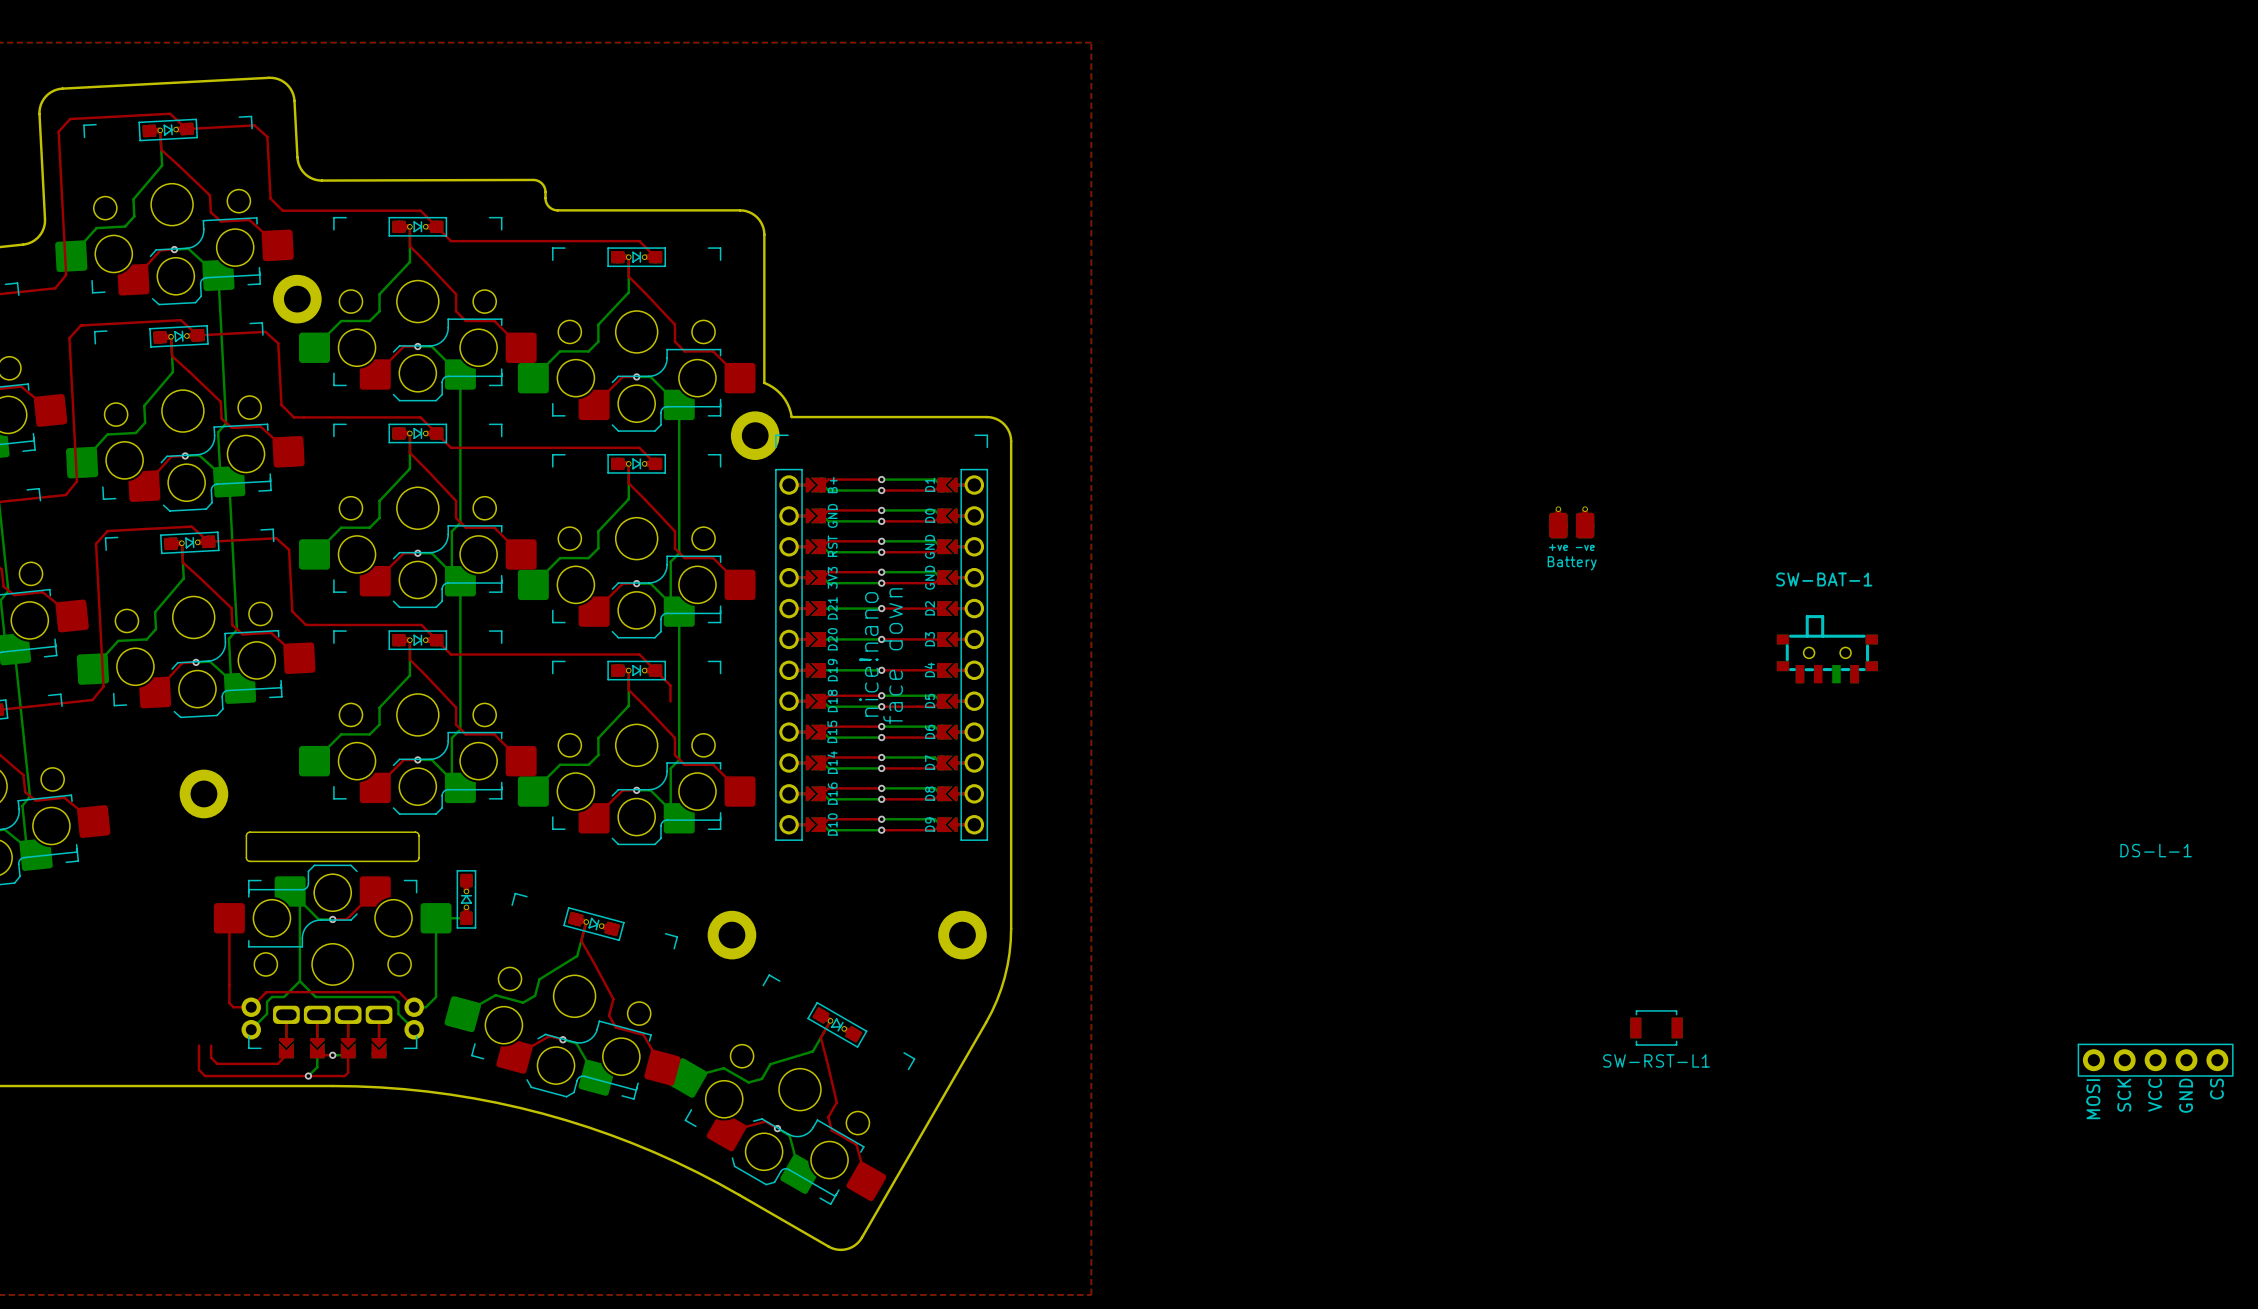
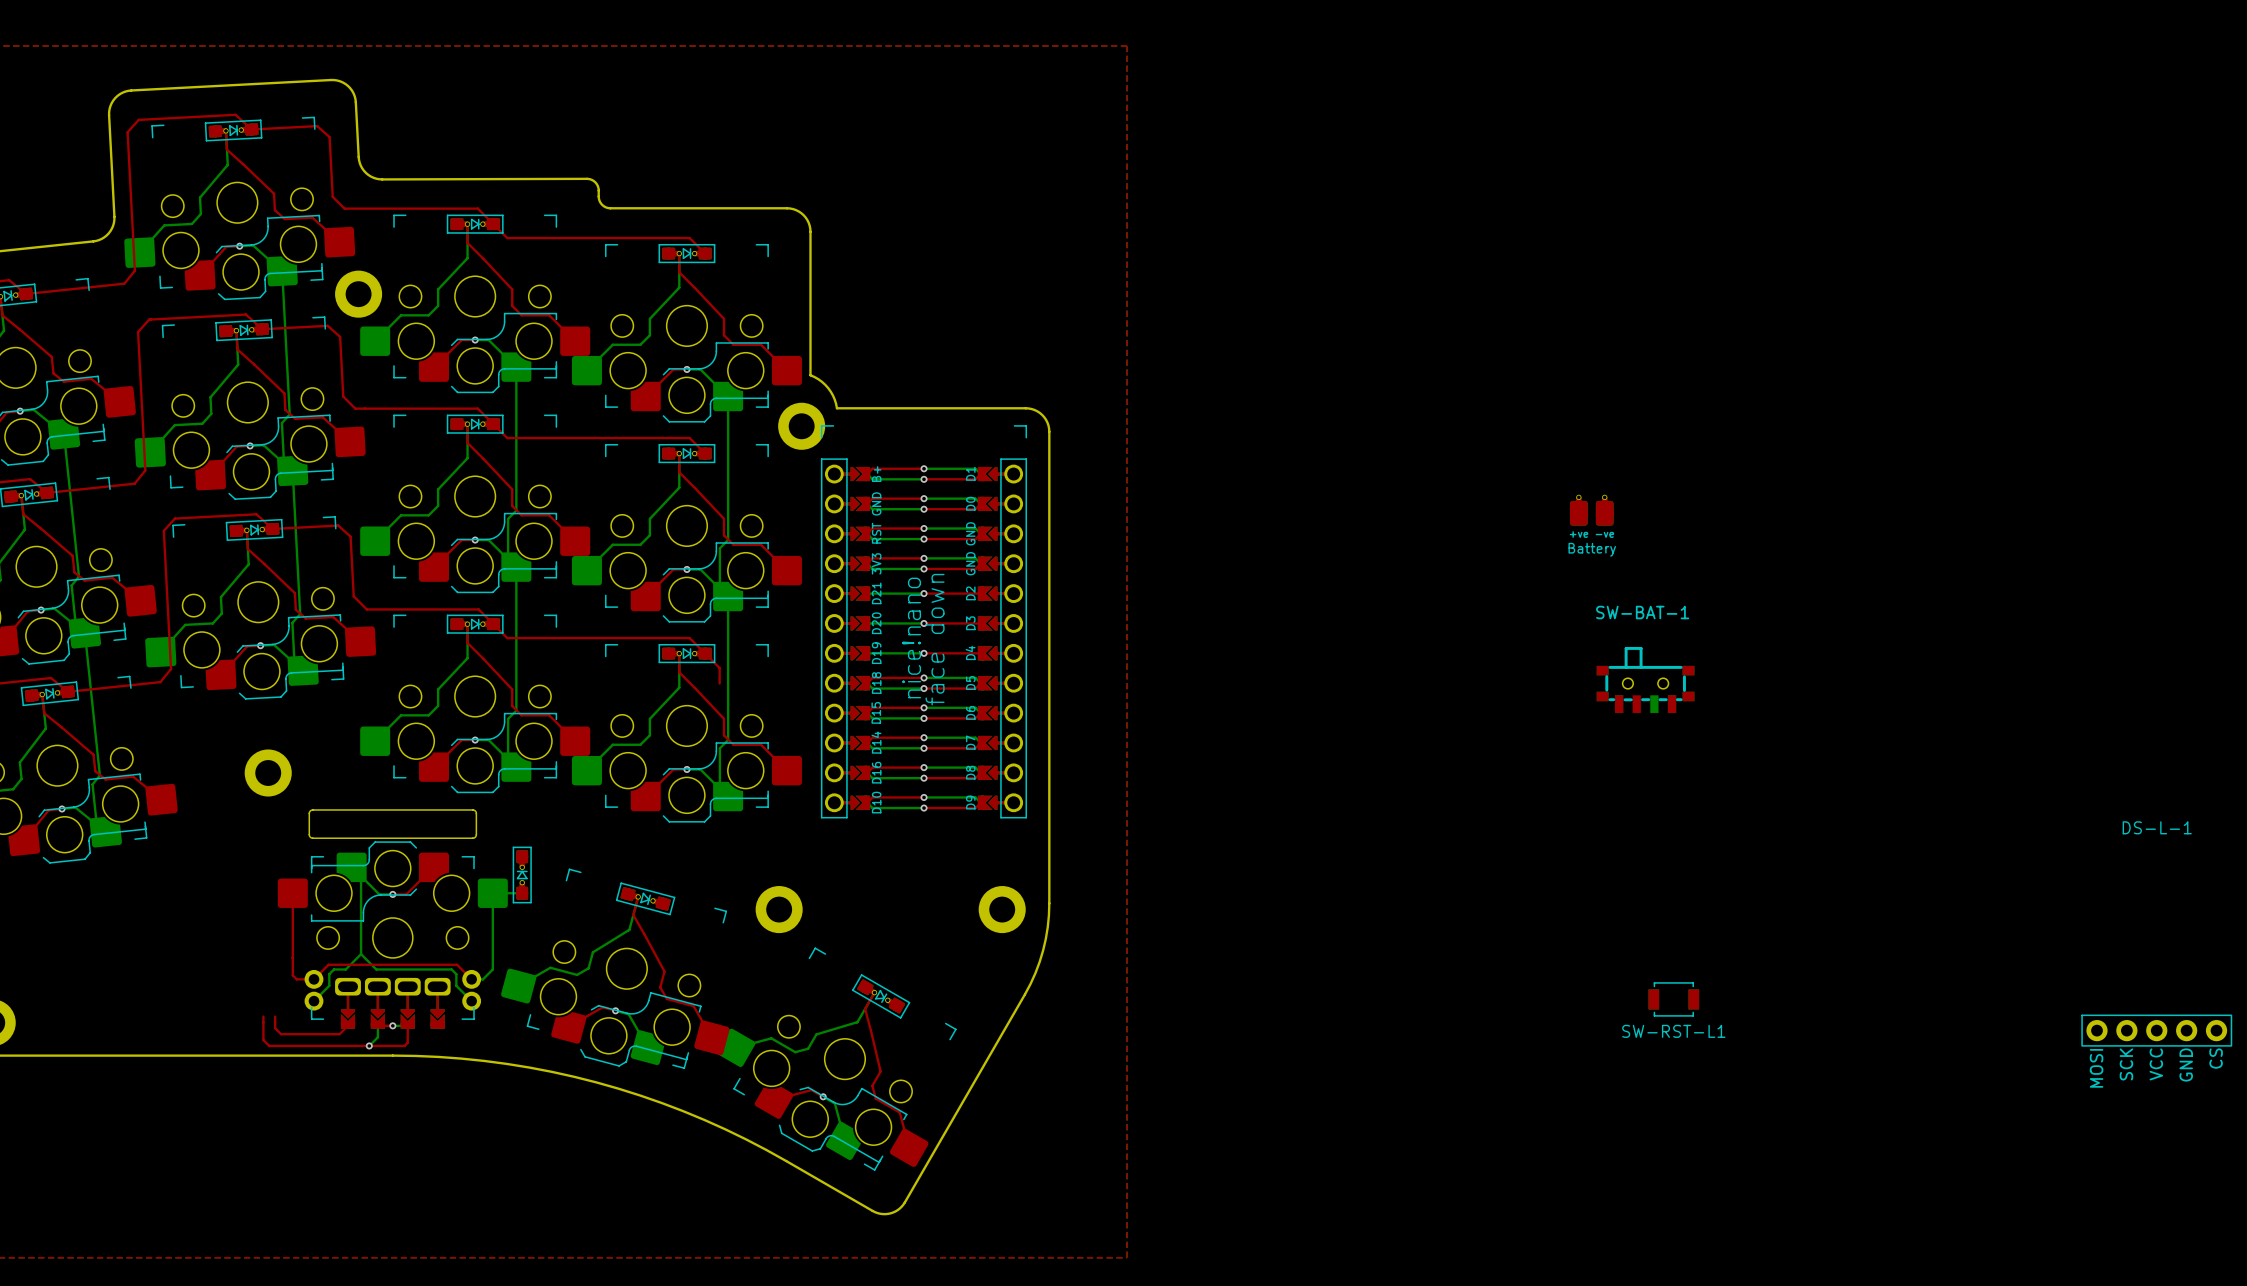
SW-BAT-1 position: (1827, 649) -> (1645, 679)

